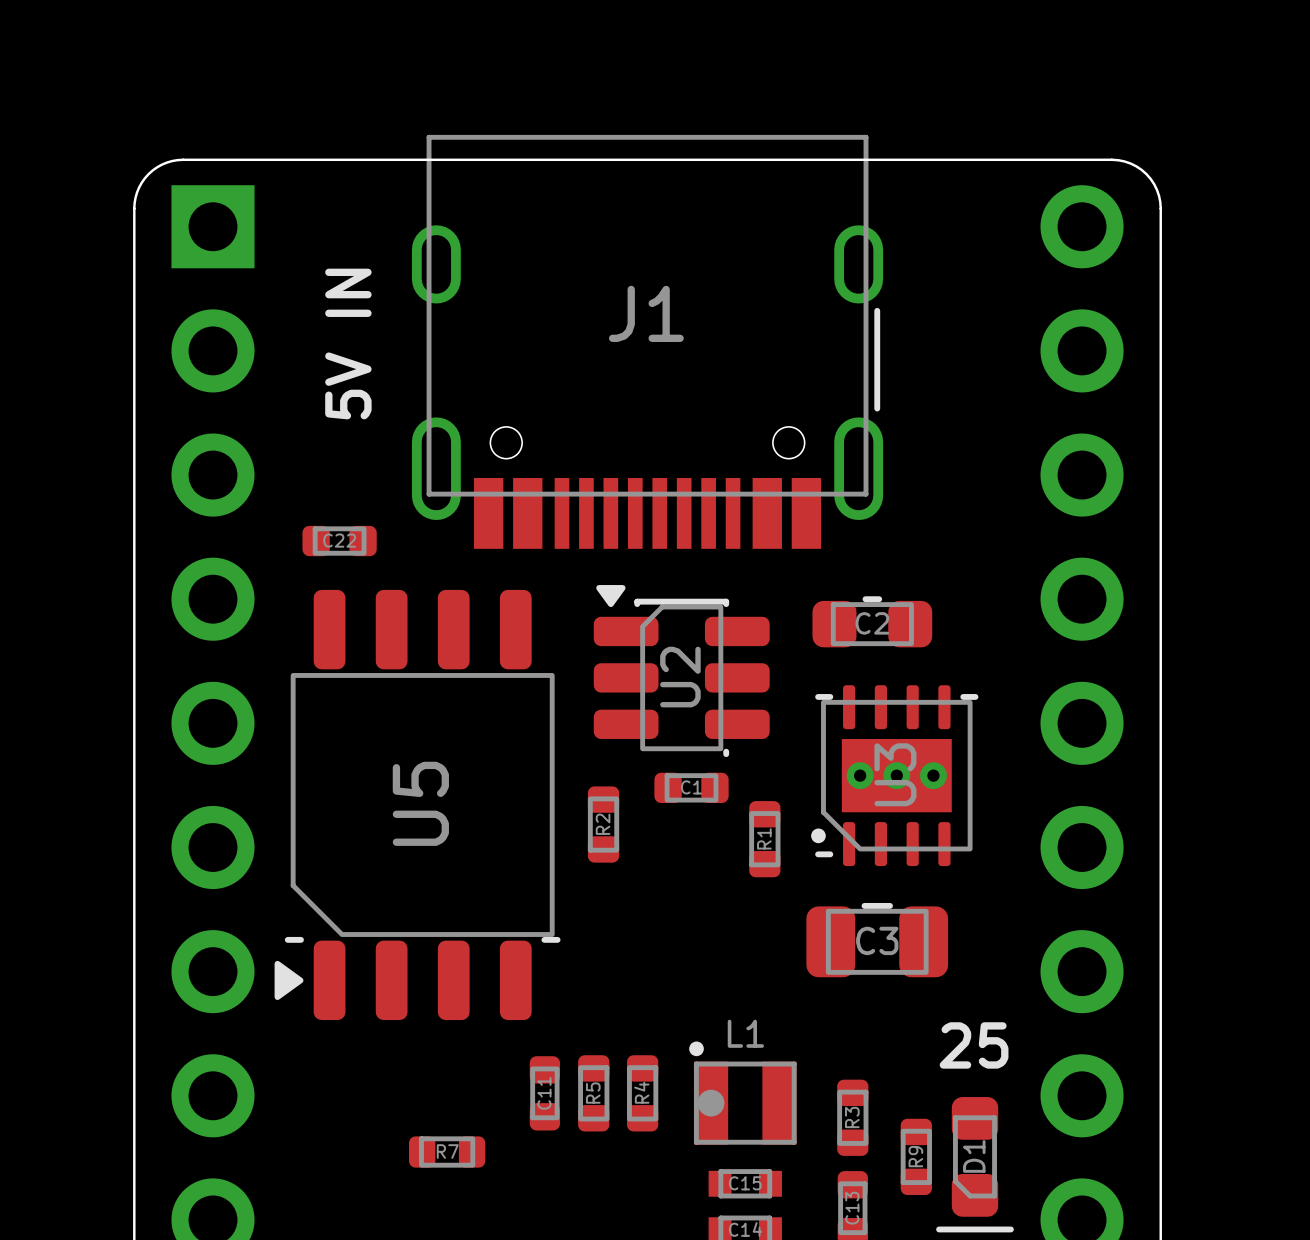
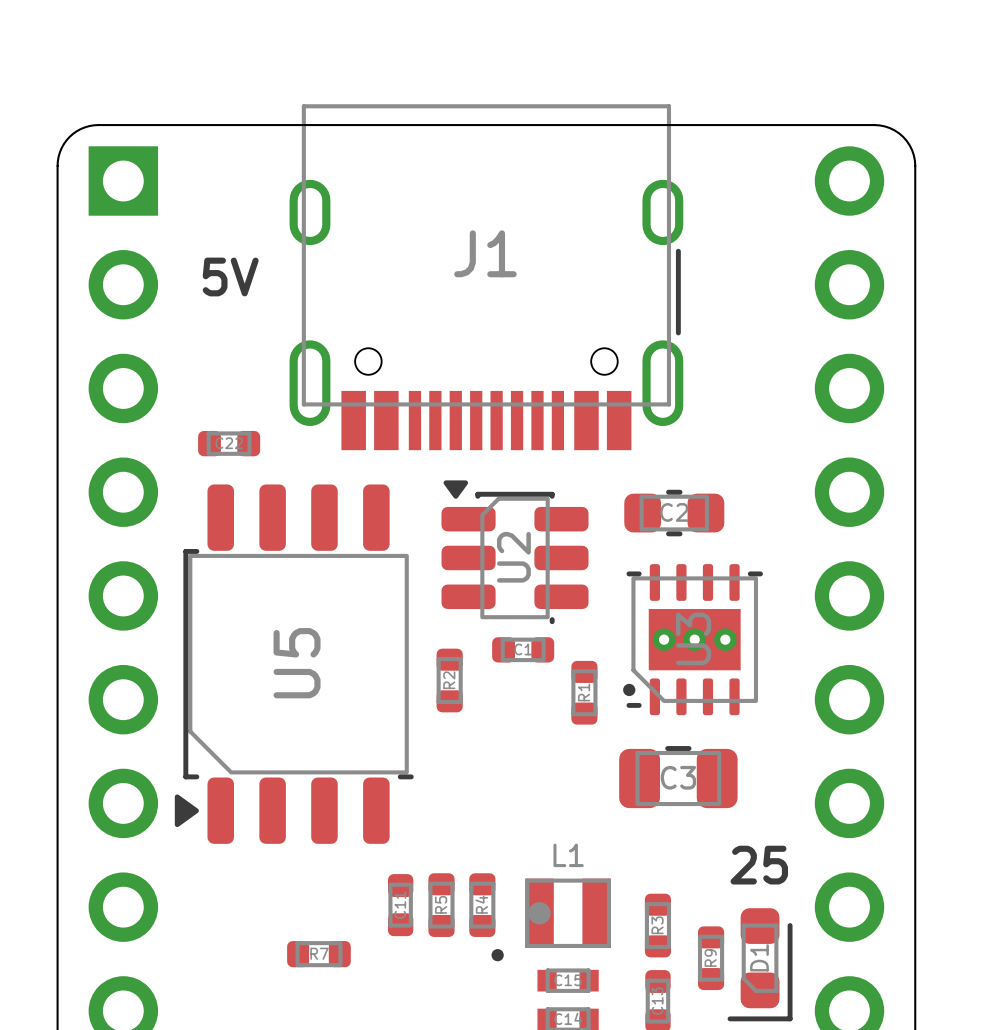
text: 5V IN (348, 344) -> 5V (230, 276)
U5 footprint: [274, 589, 561, 1021] -> [174, 484, 414, 844]
C2 footprint: [812, 596, 933, 648] -> [624, 489, 725, 537]
drawing position: (696, 1048) -> (497, 955)
D1 footprint: [936, 1097, 1014, 1233] -> [727, 908, 793, 1022]

